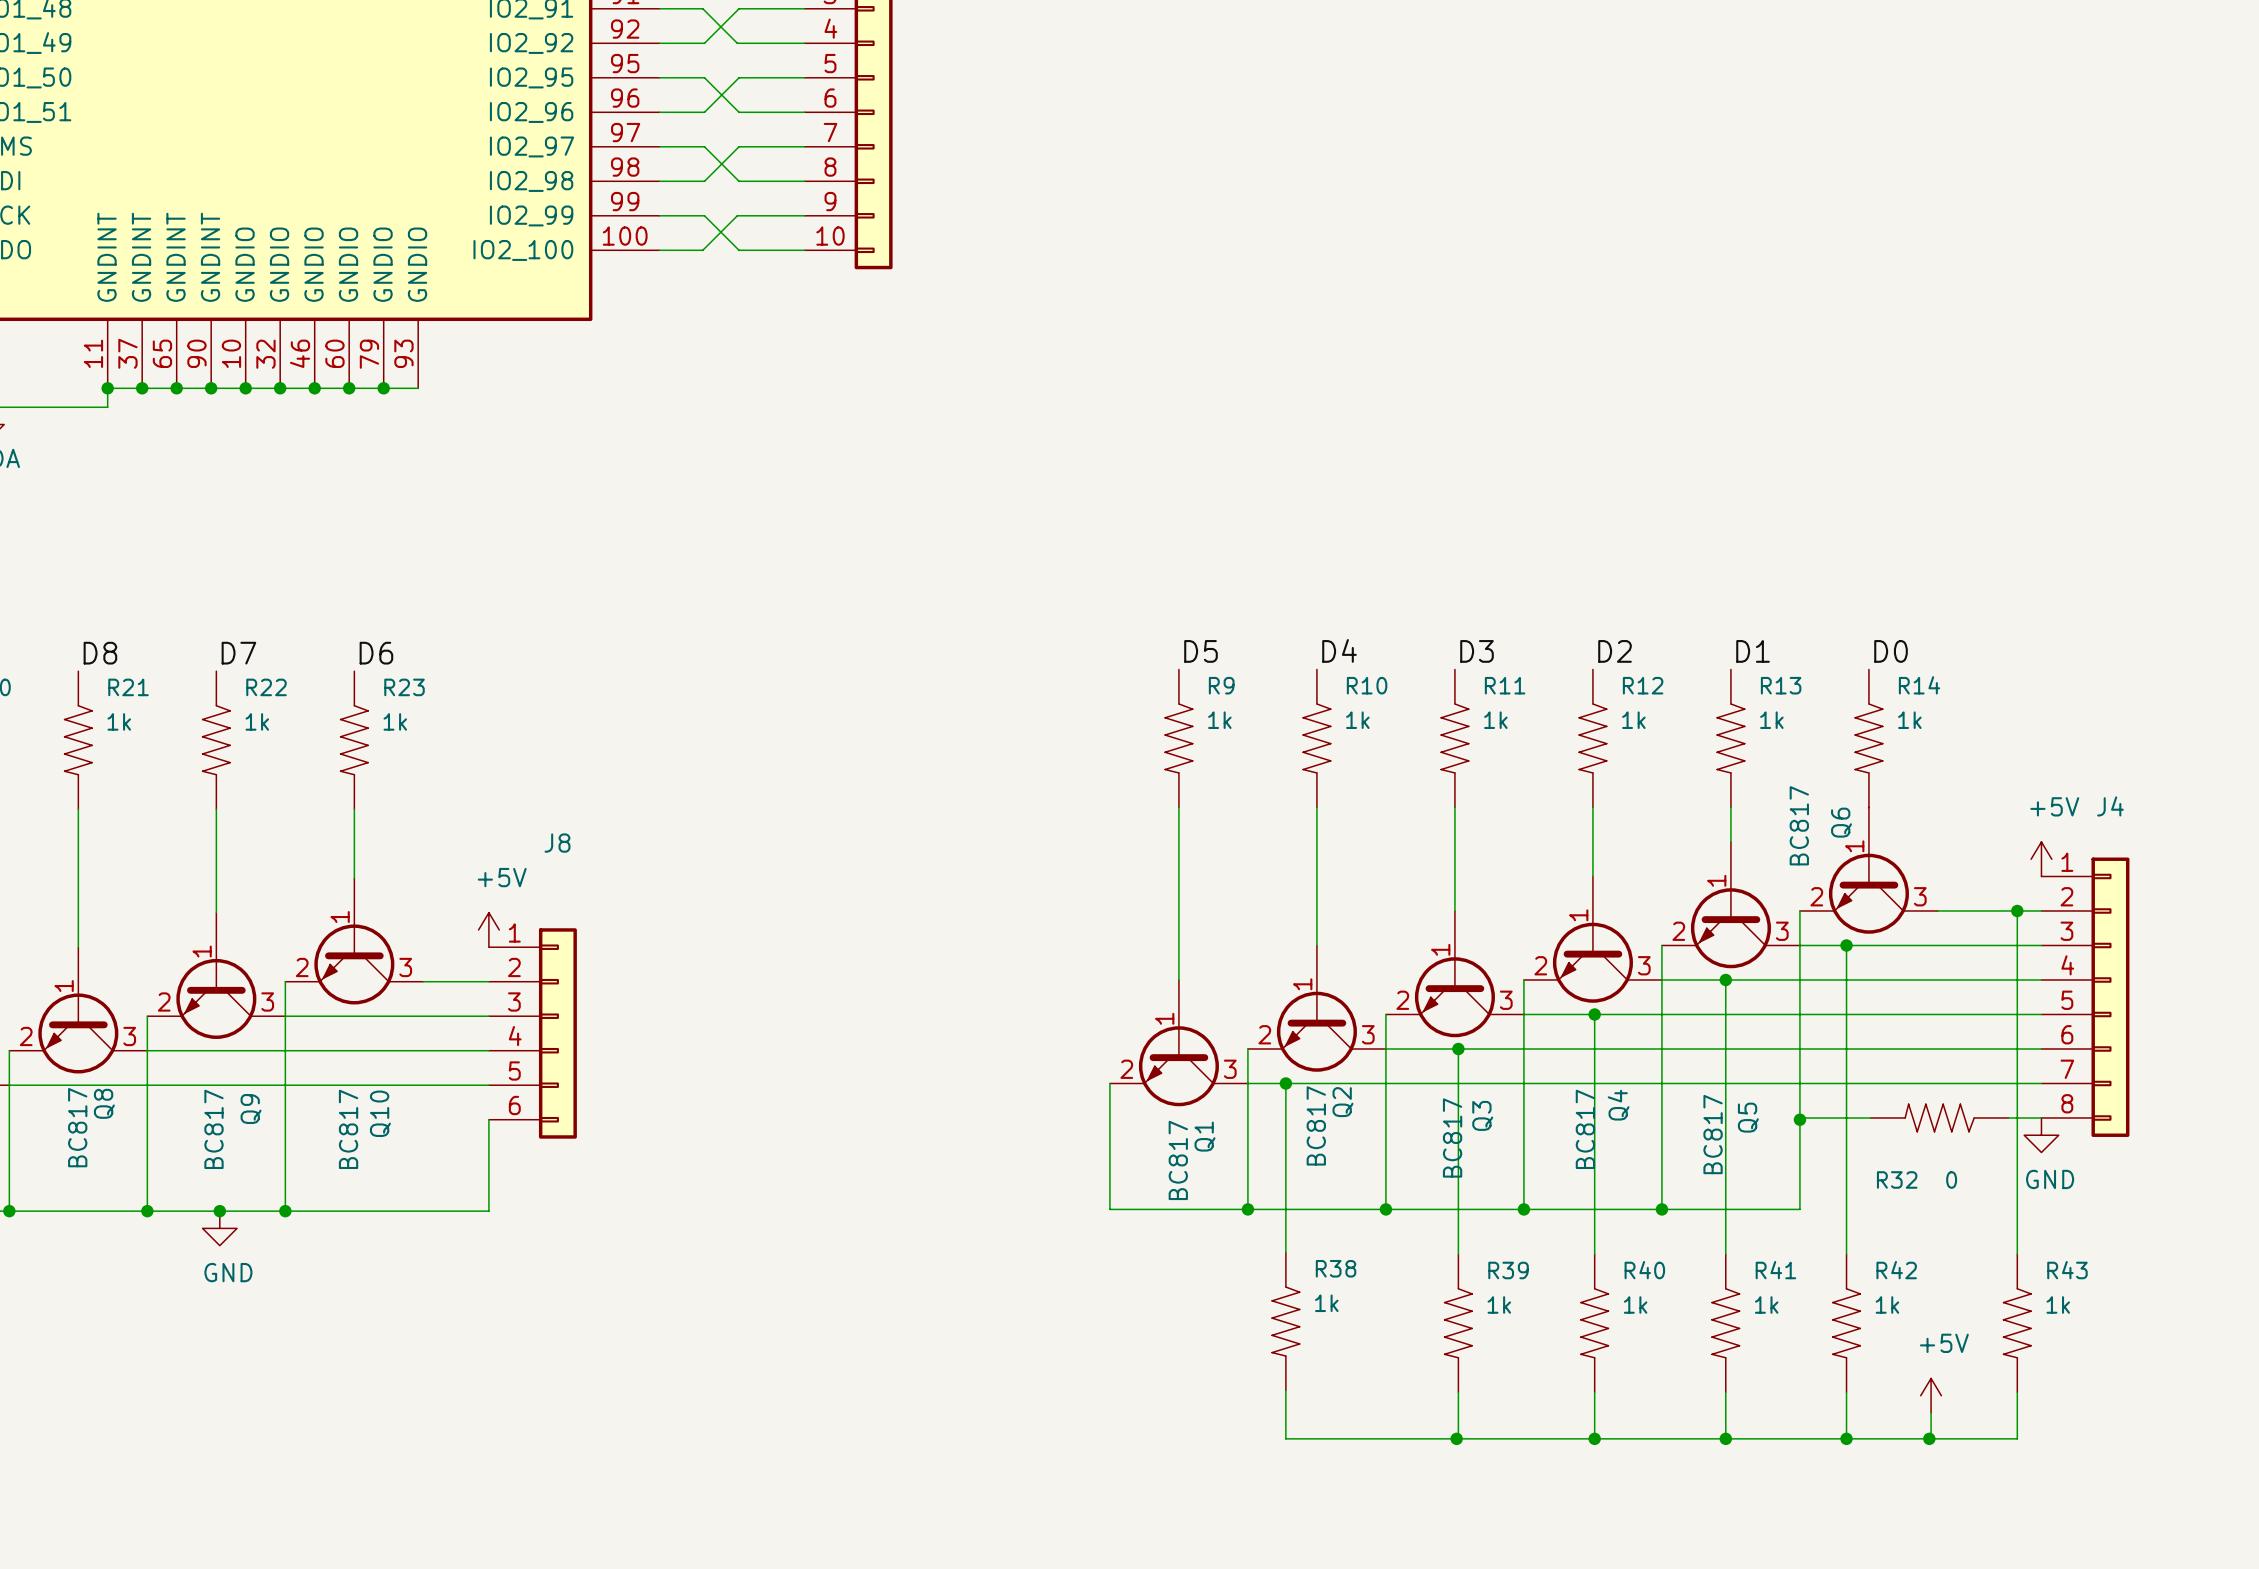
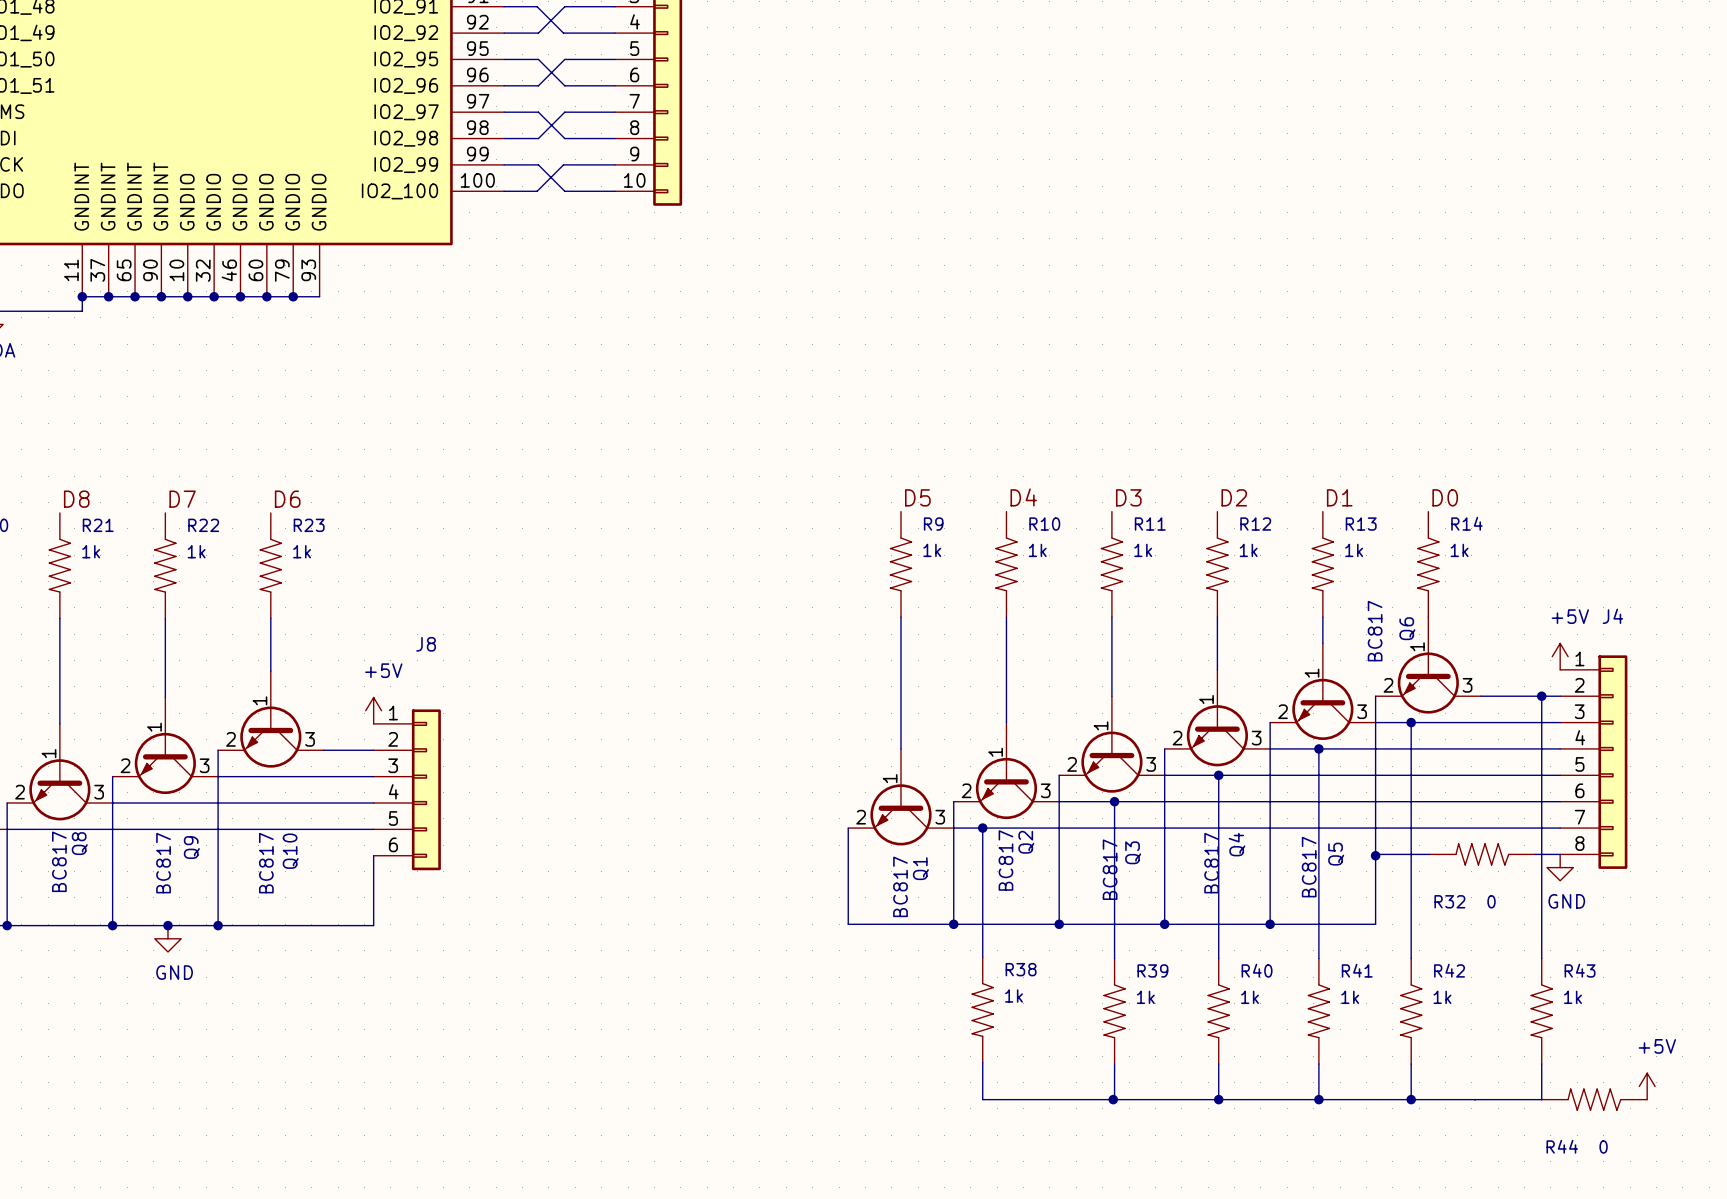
power symbol position: +5V (1931, 1395) -> +5V (1647, 1086)
wire: (1931, 1412) (1931, 1438) -> none
junction: (1929, 1438) -> none
R44: none -> 0 (1594, 1099)

